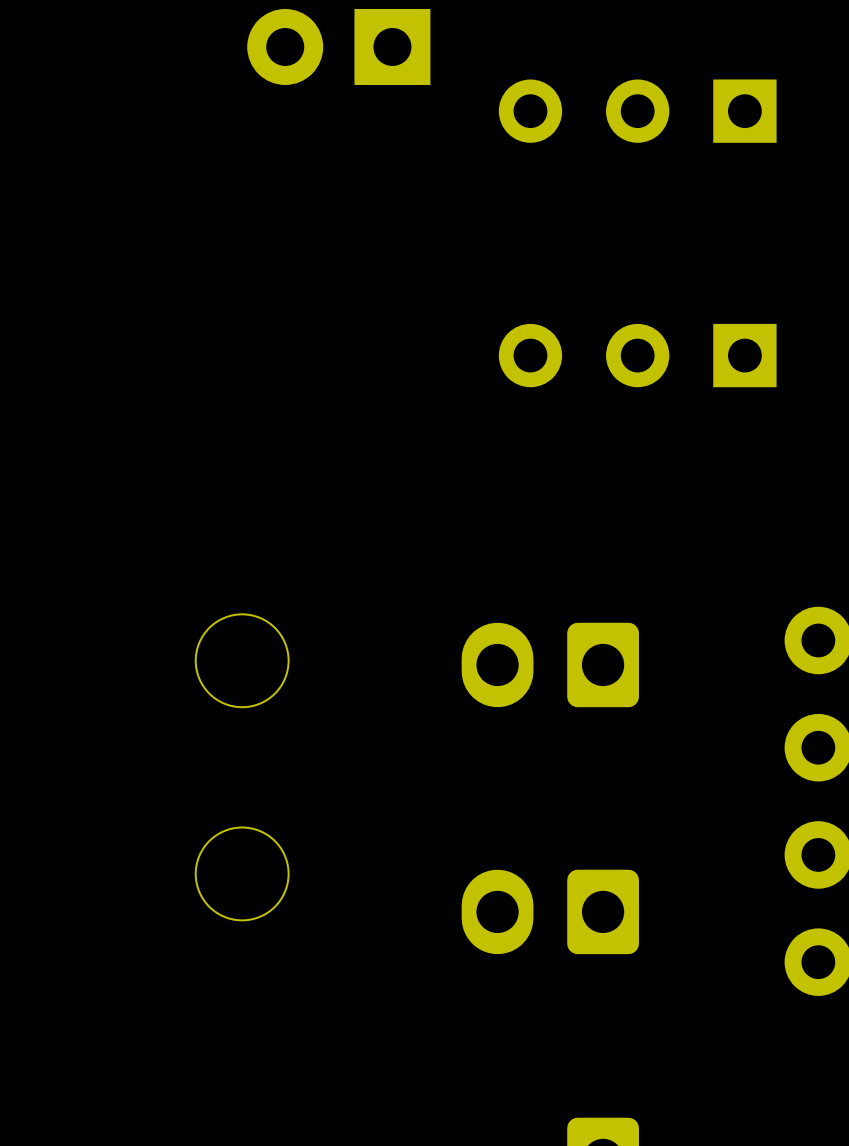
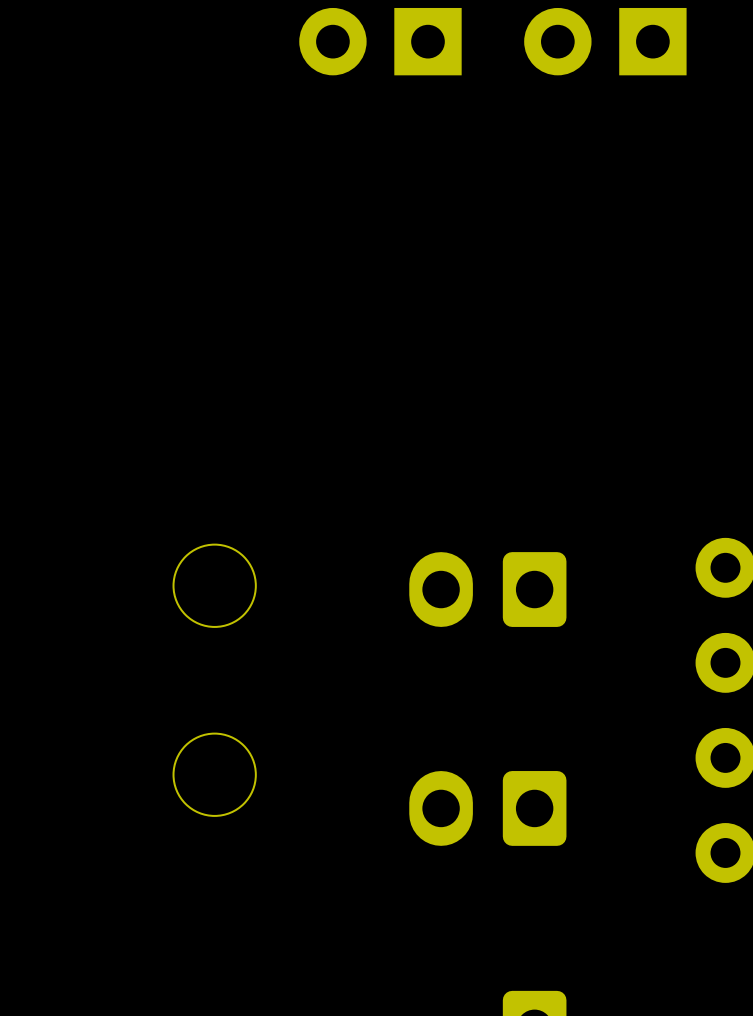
part position: (338, 46) -> (380, 41)
part: none -> (605, 41)
part: (637, 111) -> none
part: (637, 355) -> none

